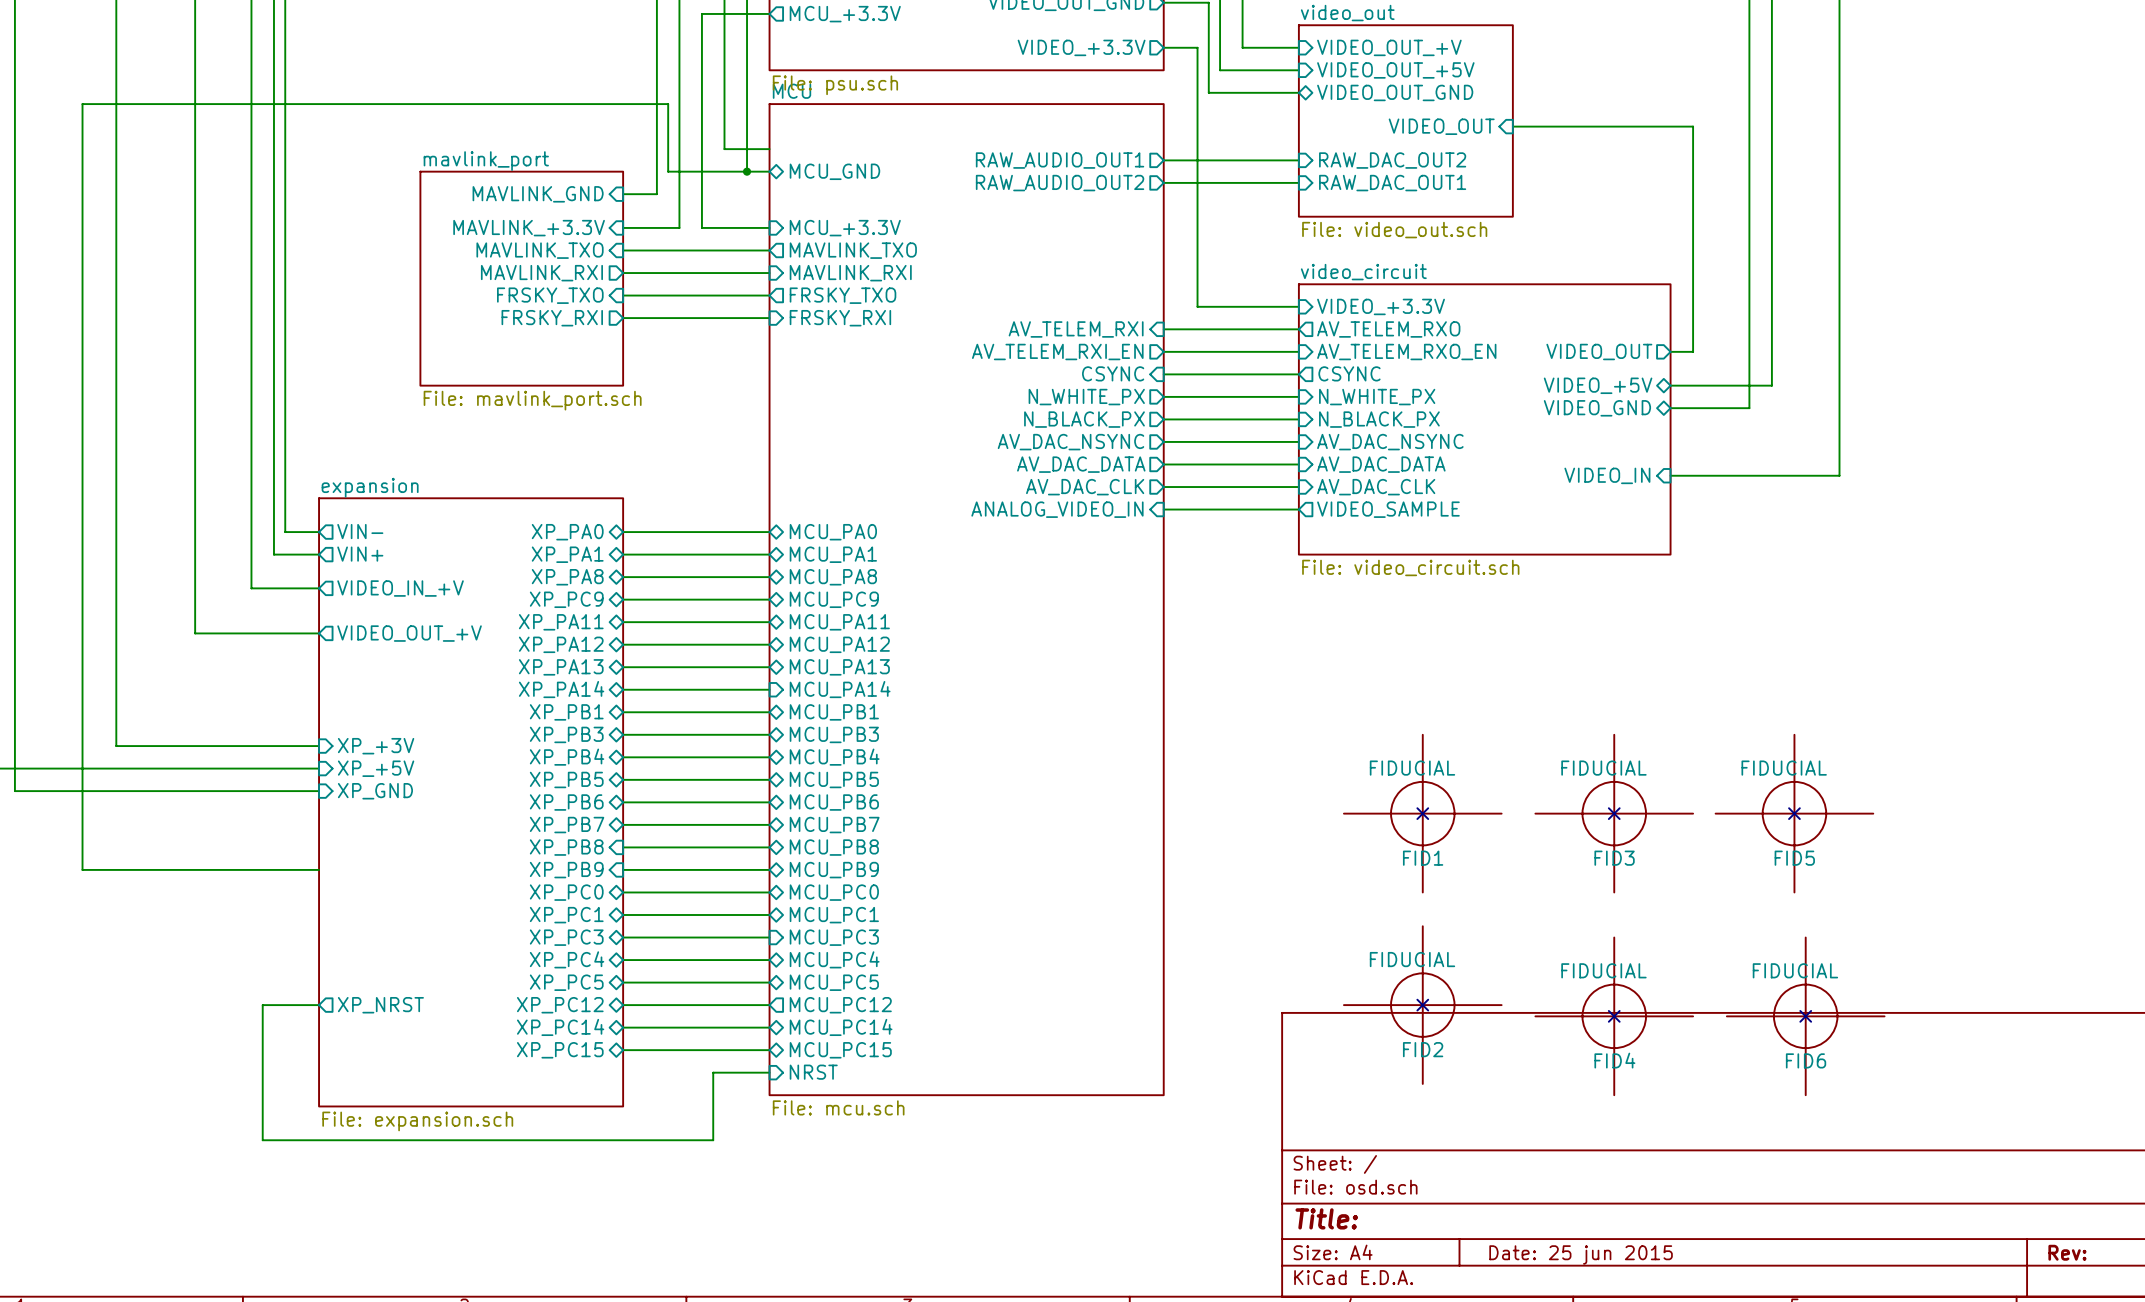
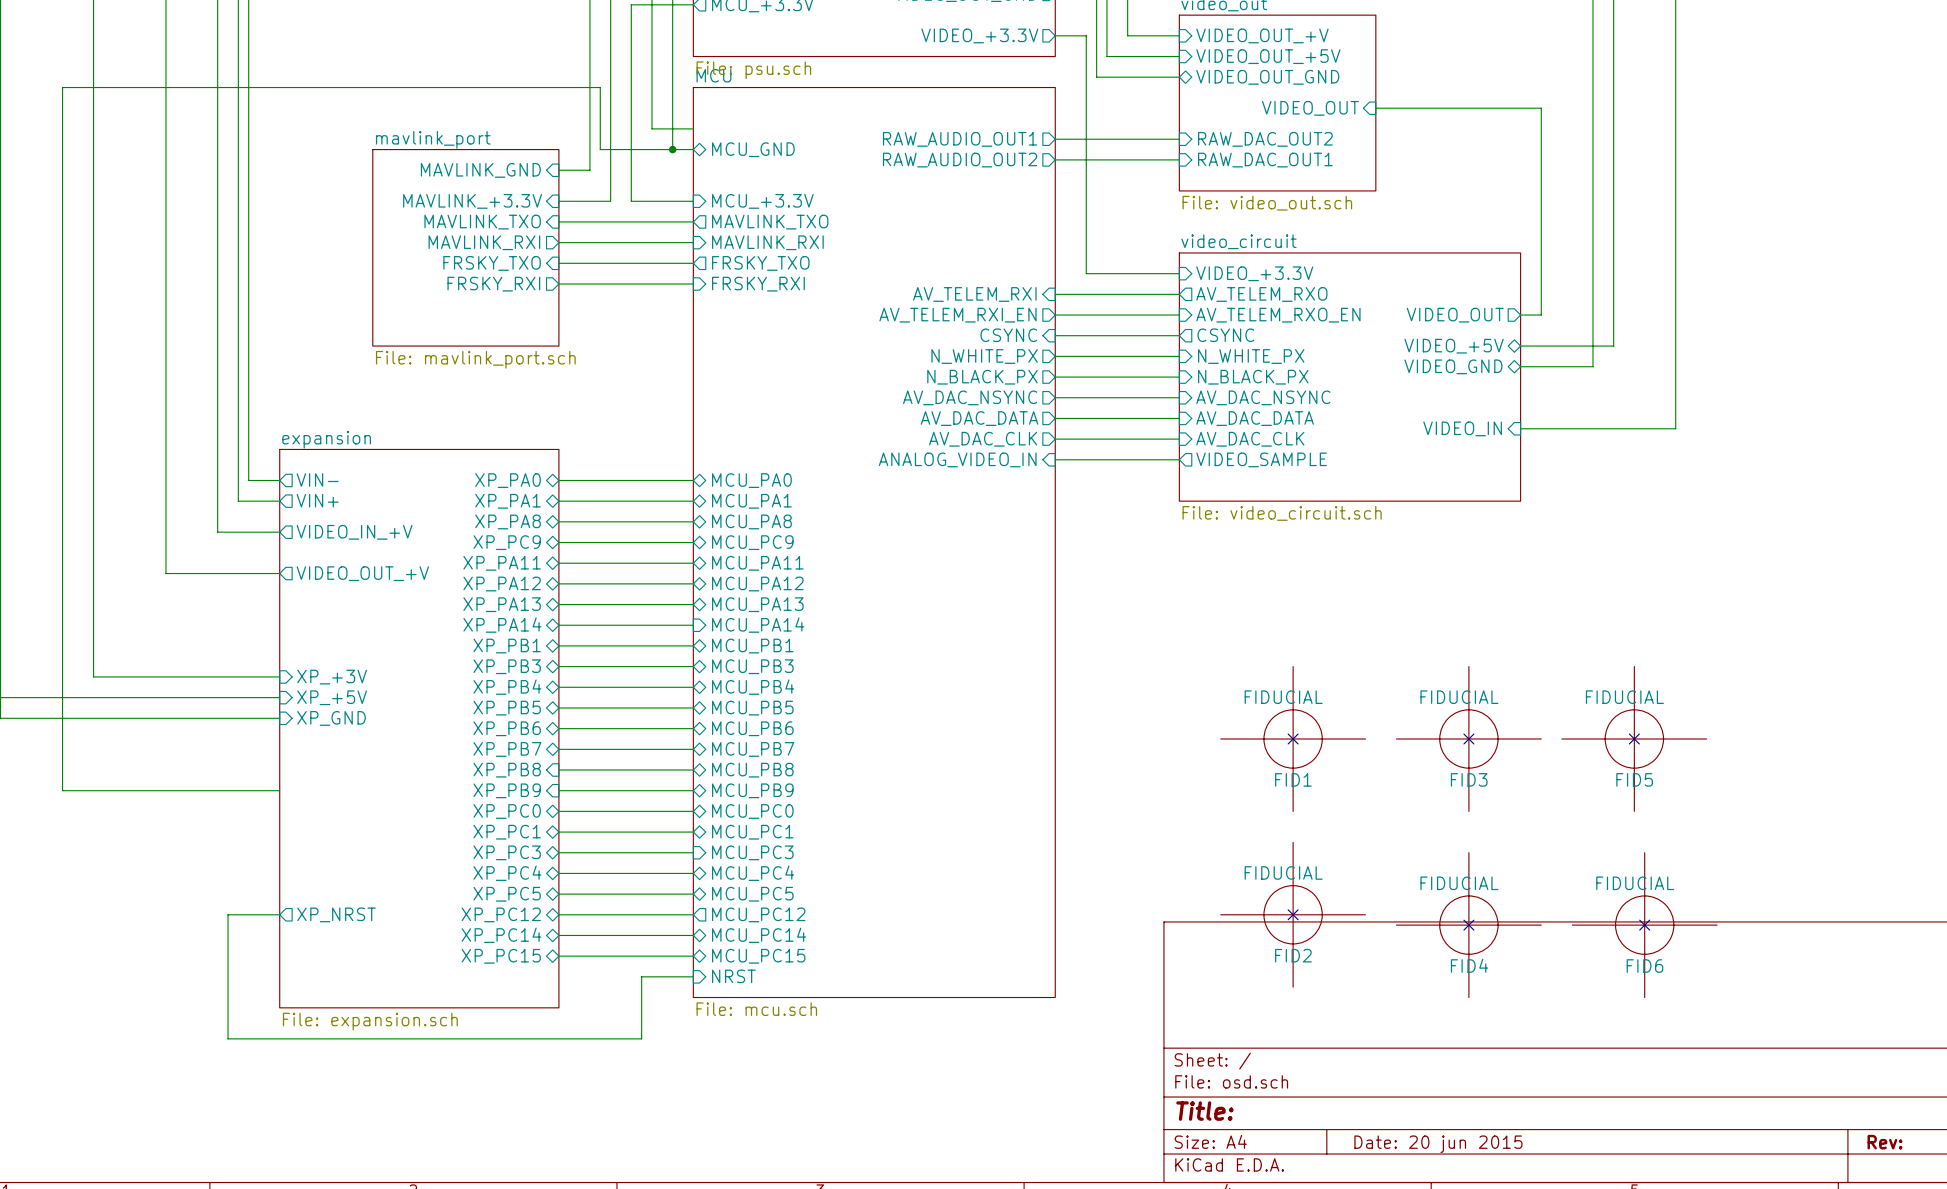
title block: Date: 25 jun 2015 (1581, 1254) -> Date: 20 jun 2015 (1438, 1144)

